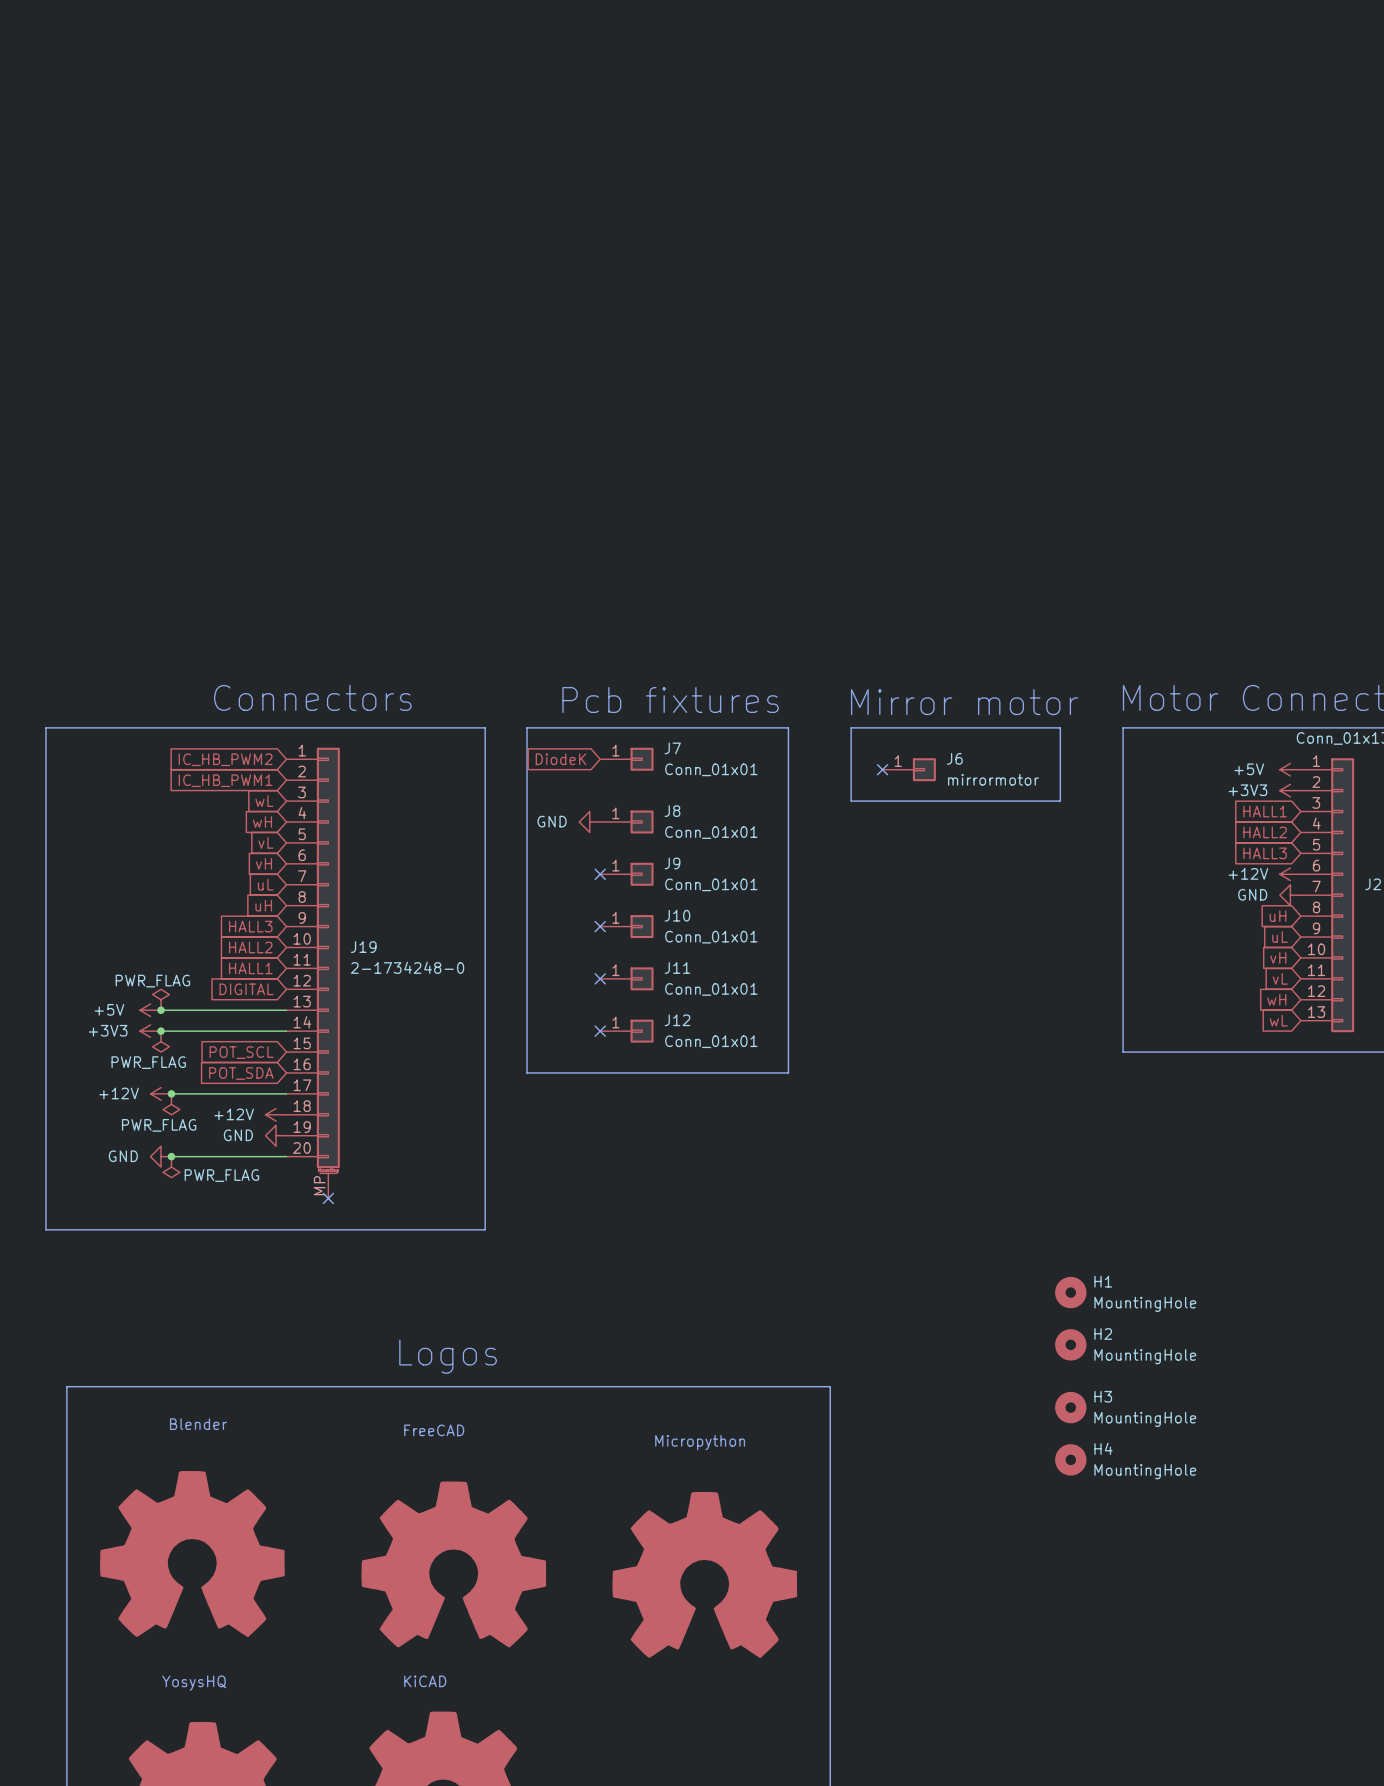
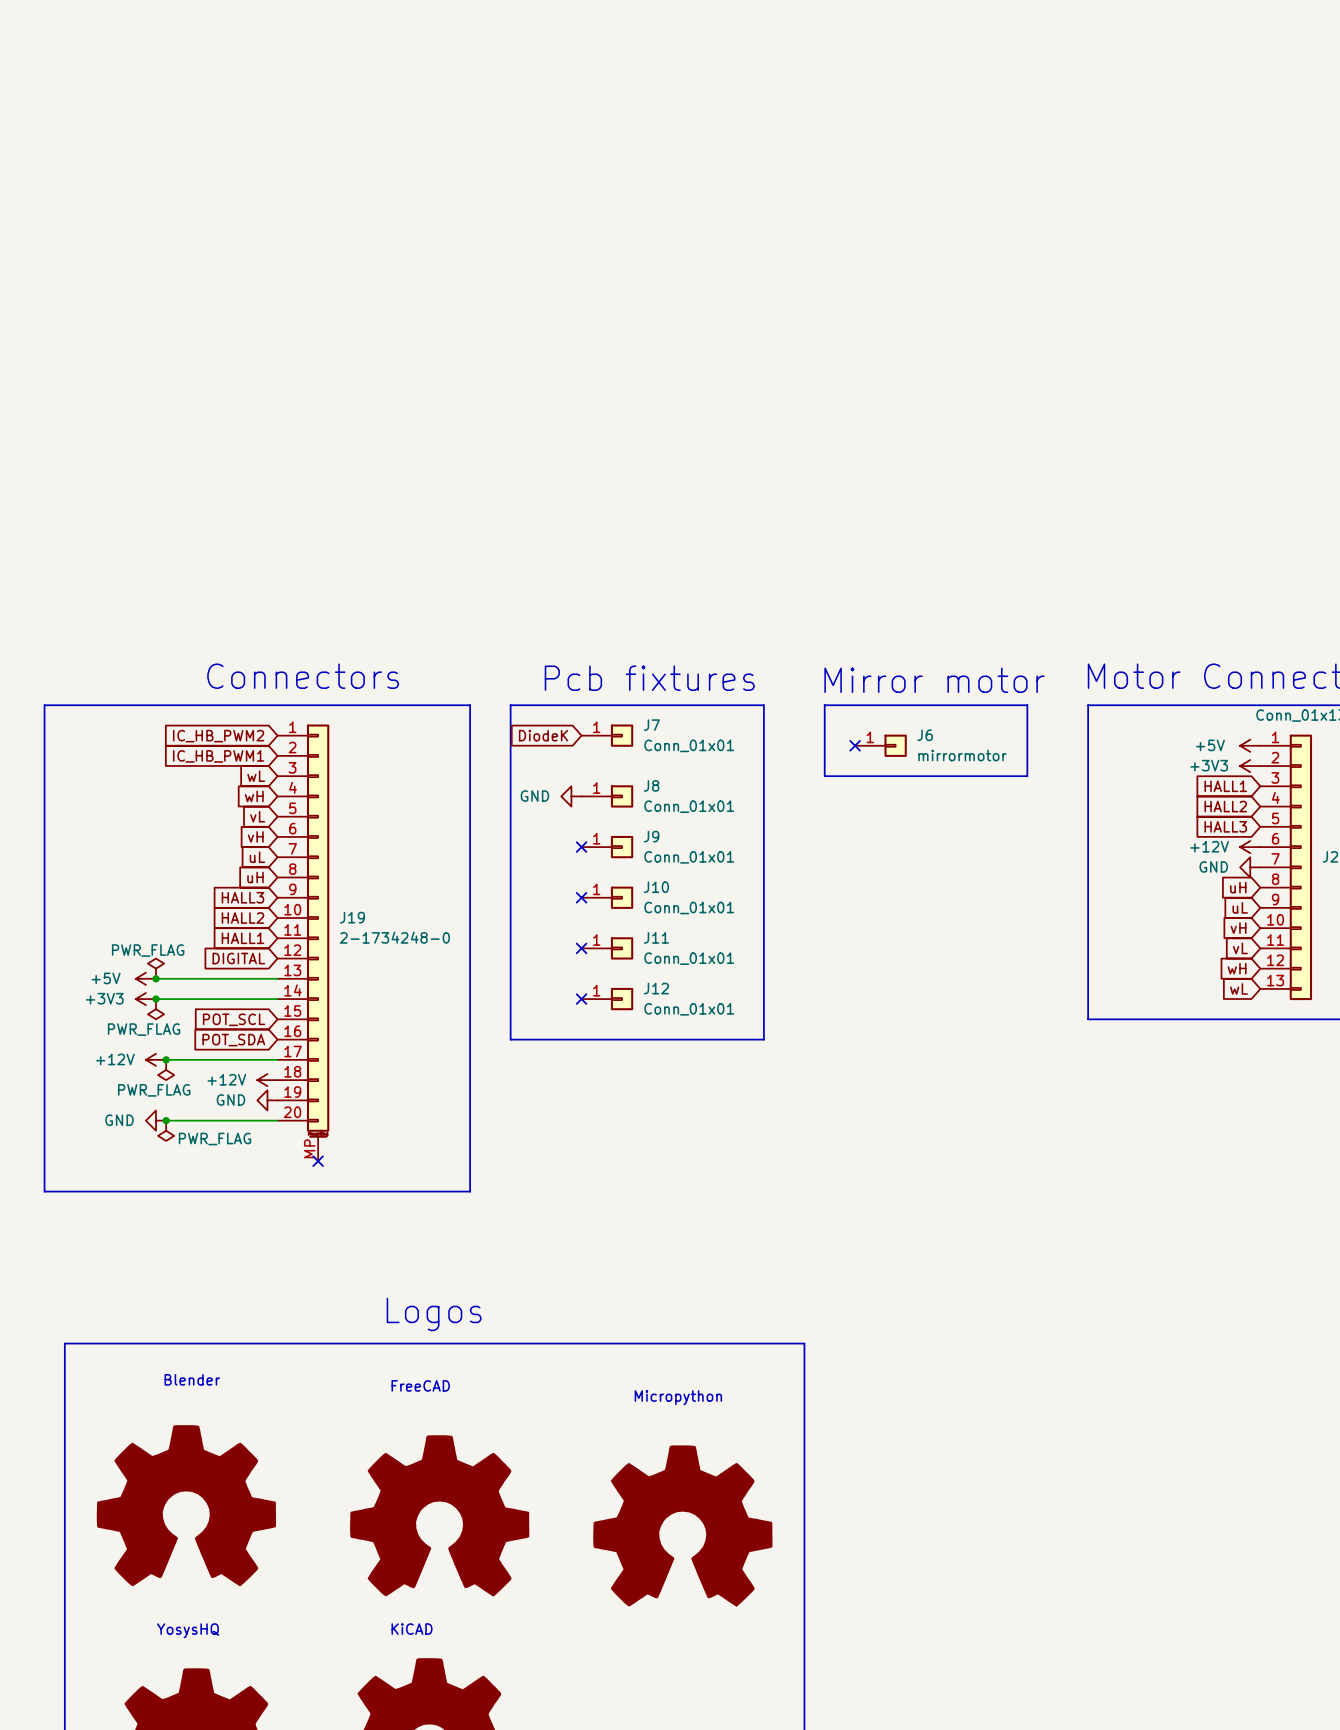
H1: MountingHole (1070, 1292) -> none
H2: MountingHole (1070, 1344) -> none
H3: MountingHole (1070, 1407) -> none
H4: MountingHole (1070, 1459) -> none

